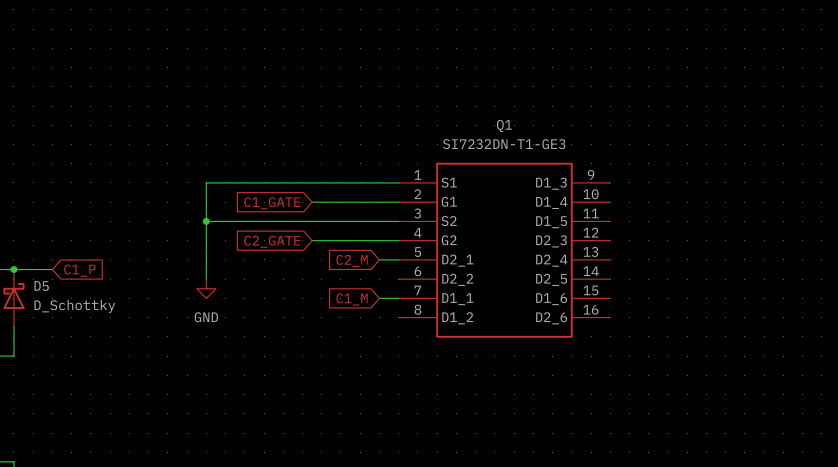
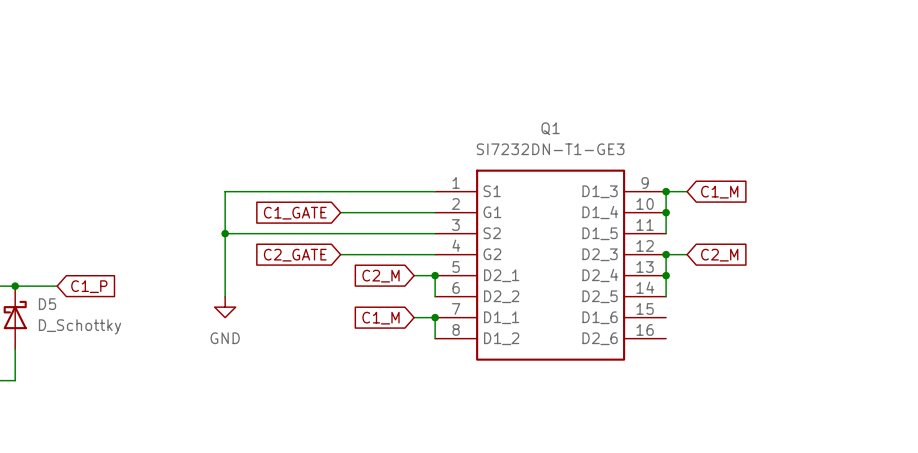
junction: none -> (666, 191)
wire: none -> (687, 191) (666, 191) (666, 233)
global label: none -> C1_M (719, 192)
junction: none -> (666, 212)
junction: none -> (666, 254)
wire: none -> (687, 254) (666, 254) (666, 296)
global label: none -> C2_M (719, 255)
wire: none -> (435, 275) (435, 296)
junction: none -> (435, 275)
junction: none -> (666, 275)
wire: none -> (435, 317) (435, 338)
junction: none -> (435, 317)

